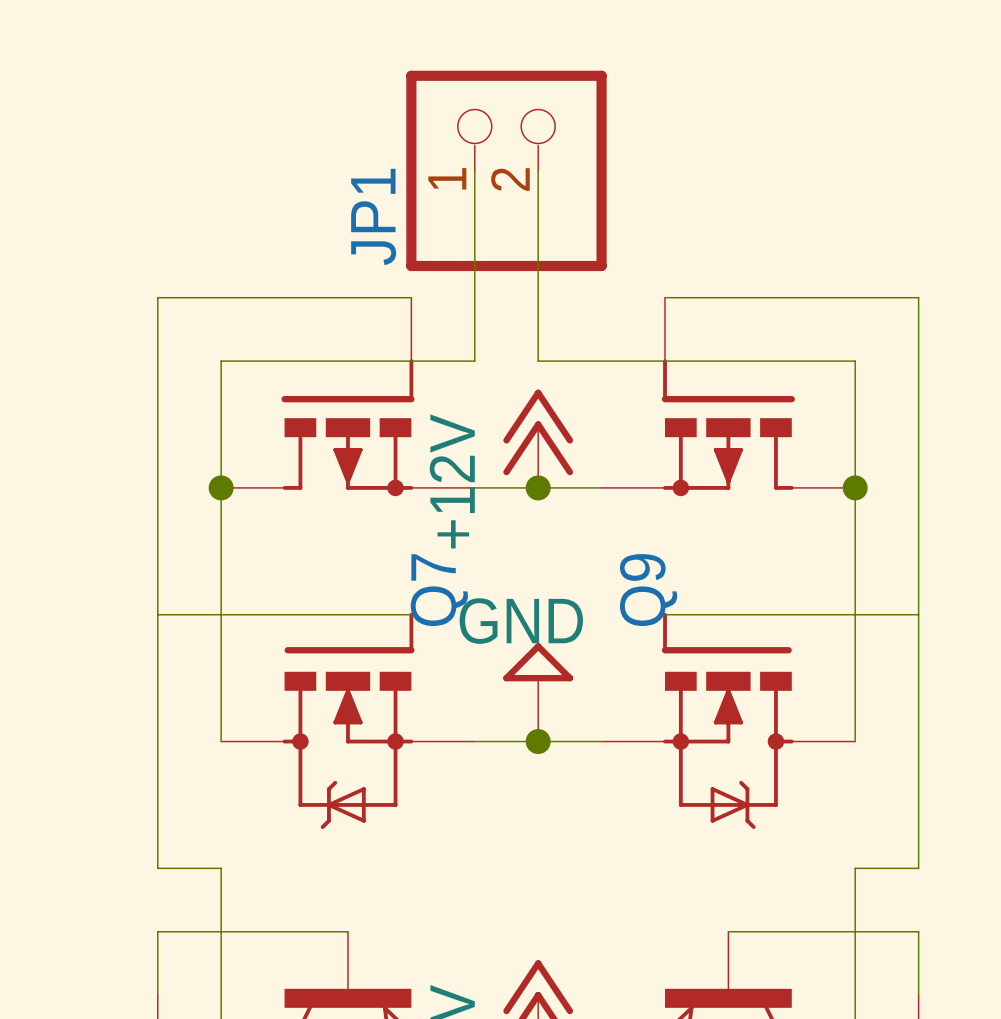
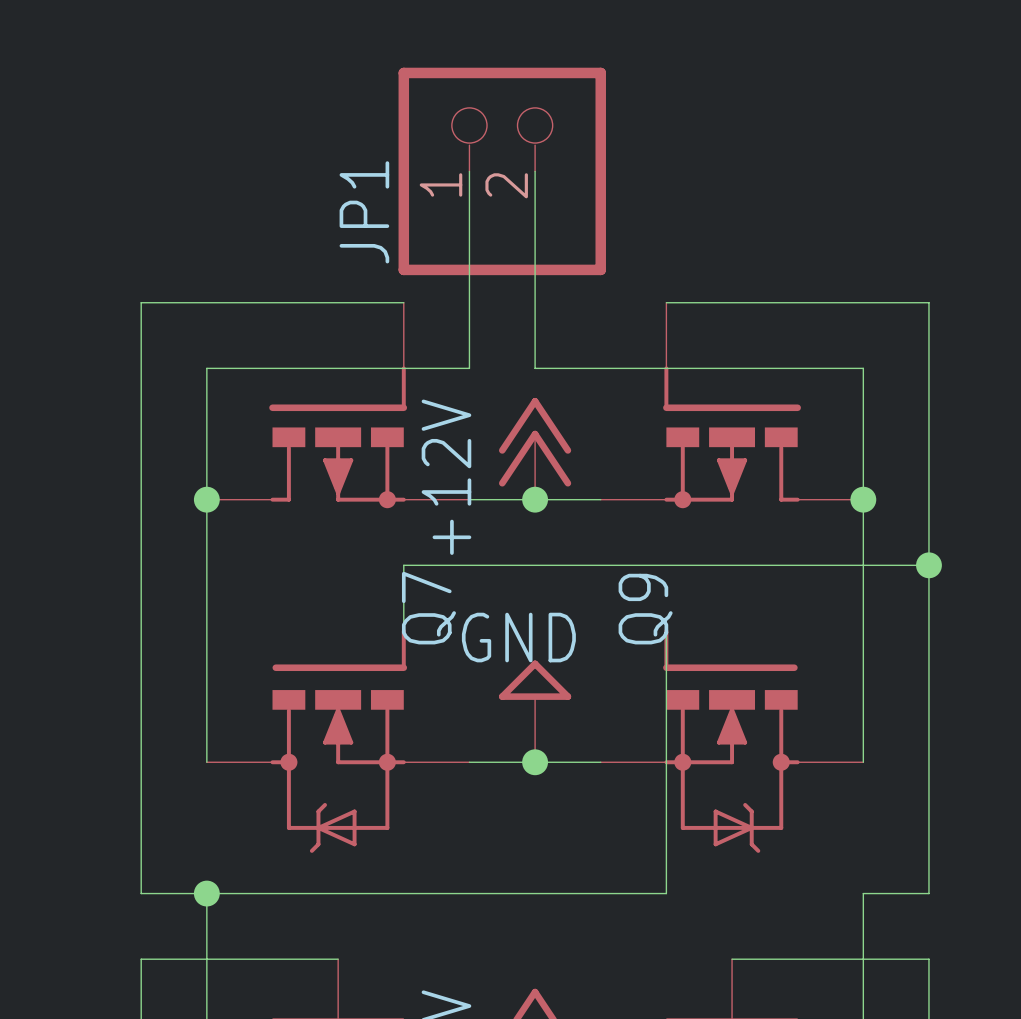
junction: none -> (928, 565)
wire: (157, 614) (411, 614) -> (928, 565) (403, 565) (403, 630)
wire: (664, 614) (918, 614) -> (666, 630) (666, 893) (206, 893)
junction: none -> (206, 893)

